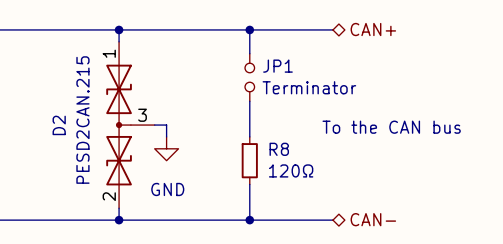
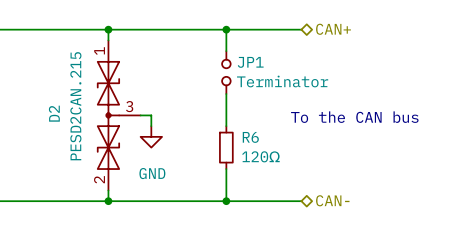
R8 name: R8 (279, 149) -> R6 (250, 137)

